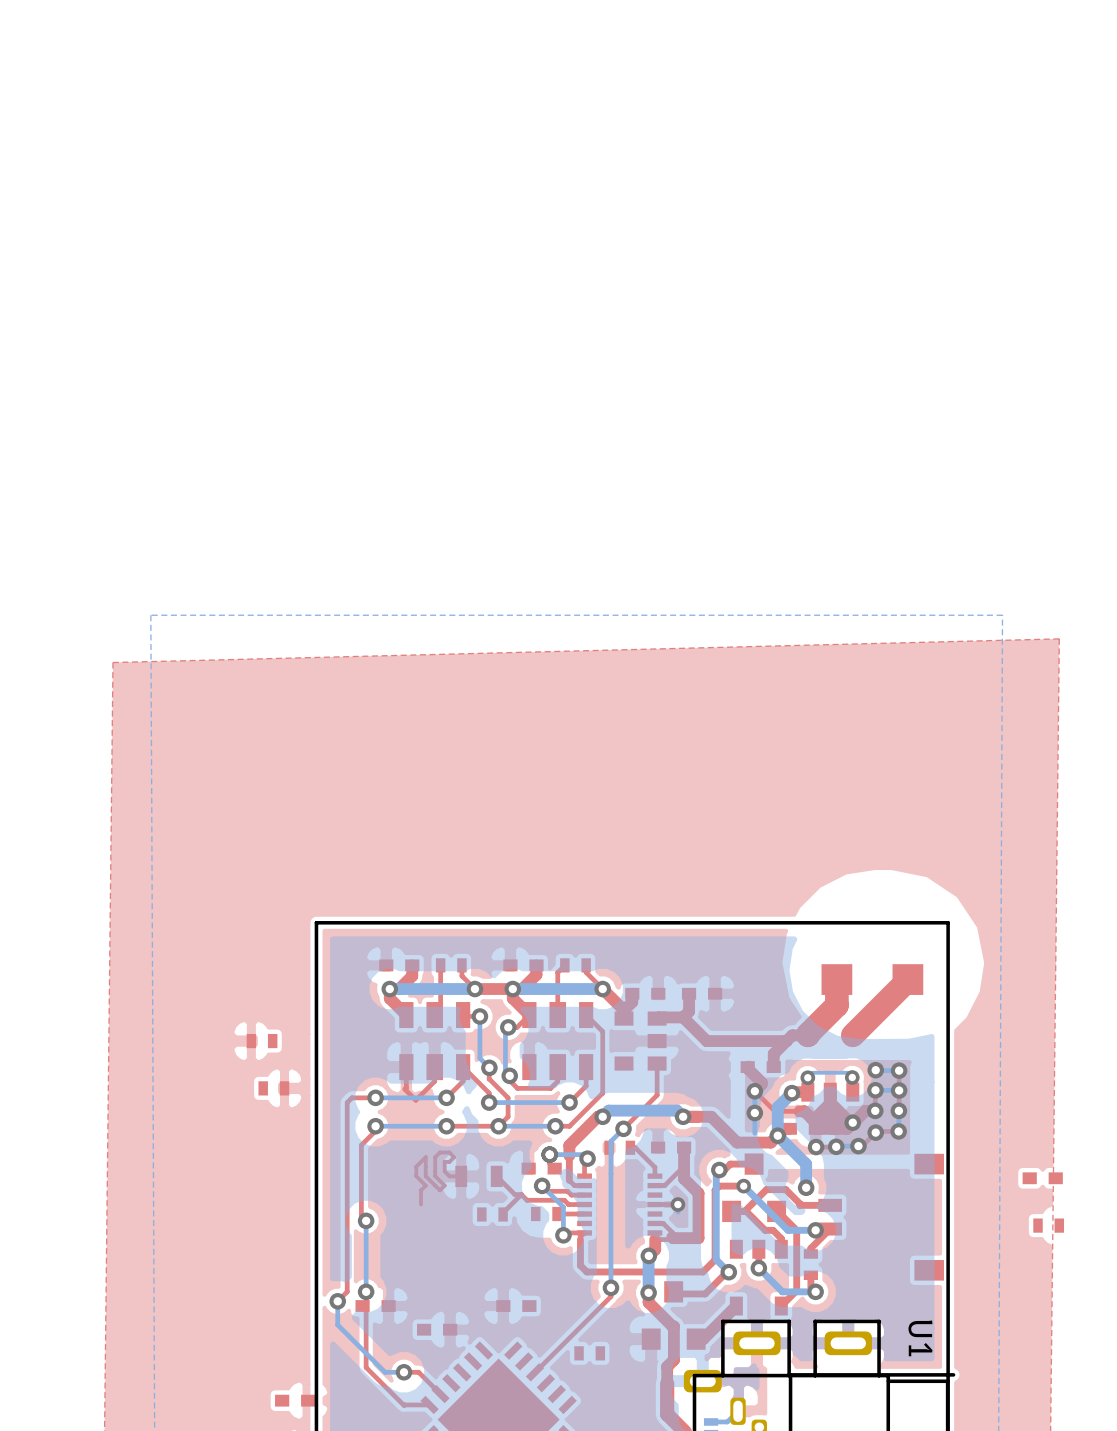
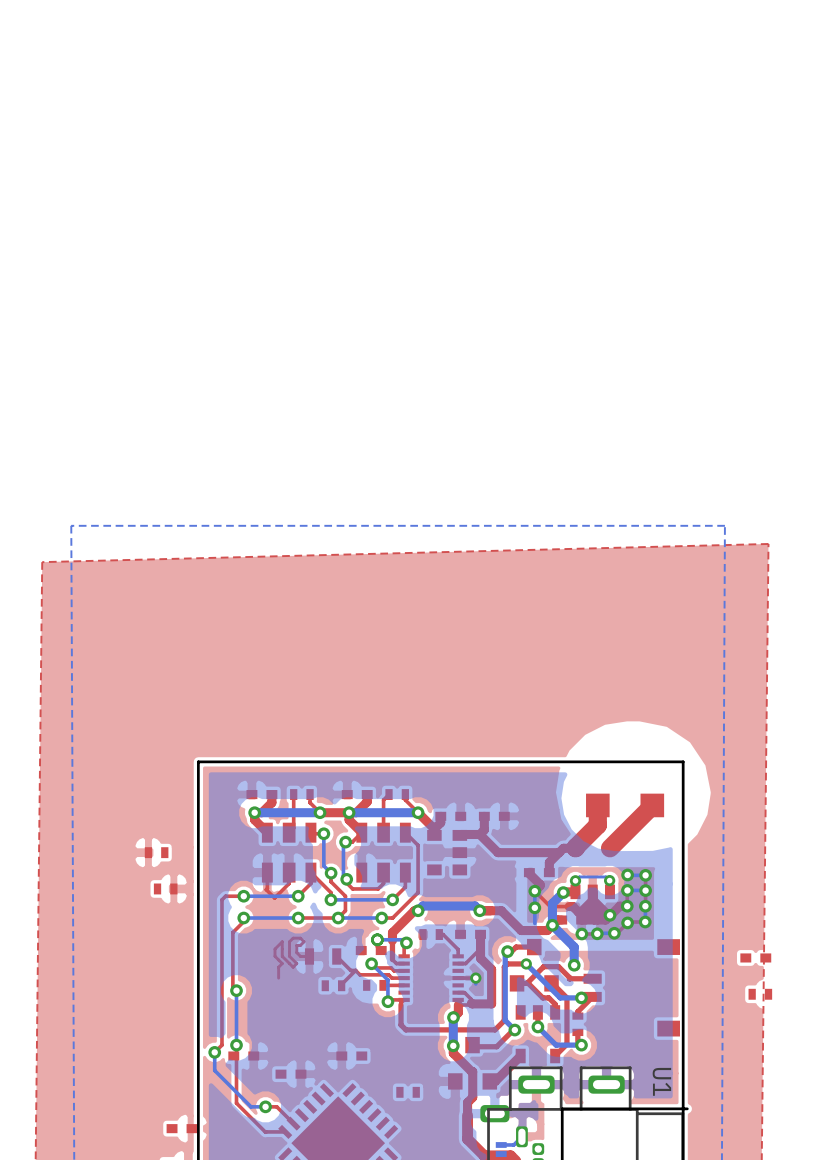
top track: (657, 1063) (657, 1095) (623, 1128) -> none
bottom track: (623, 1128) (610, 1141) (610, 1287) -> none
via: (623, 1128) -> none
top track: (610, 1287) (610, 1296) (535, 1372) -> none
via: (610, 1287) -> none

